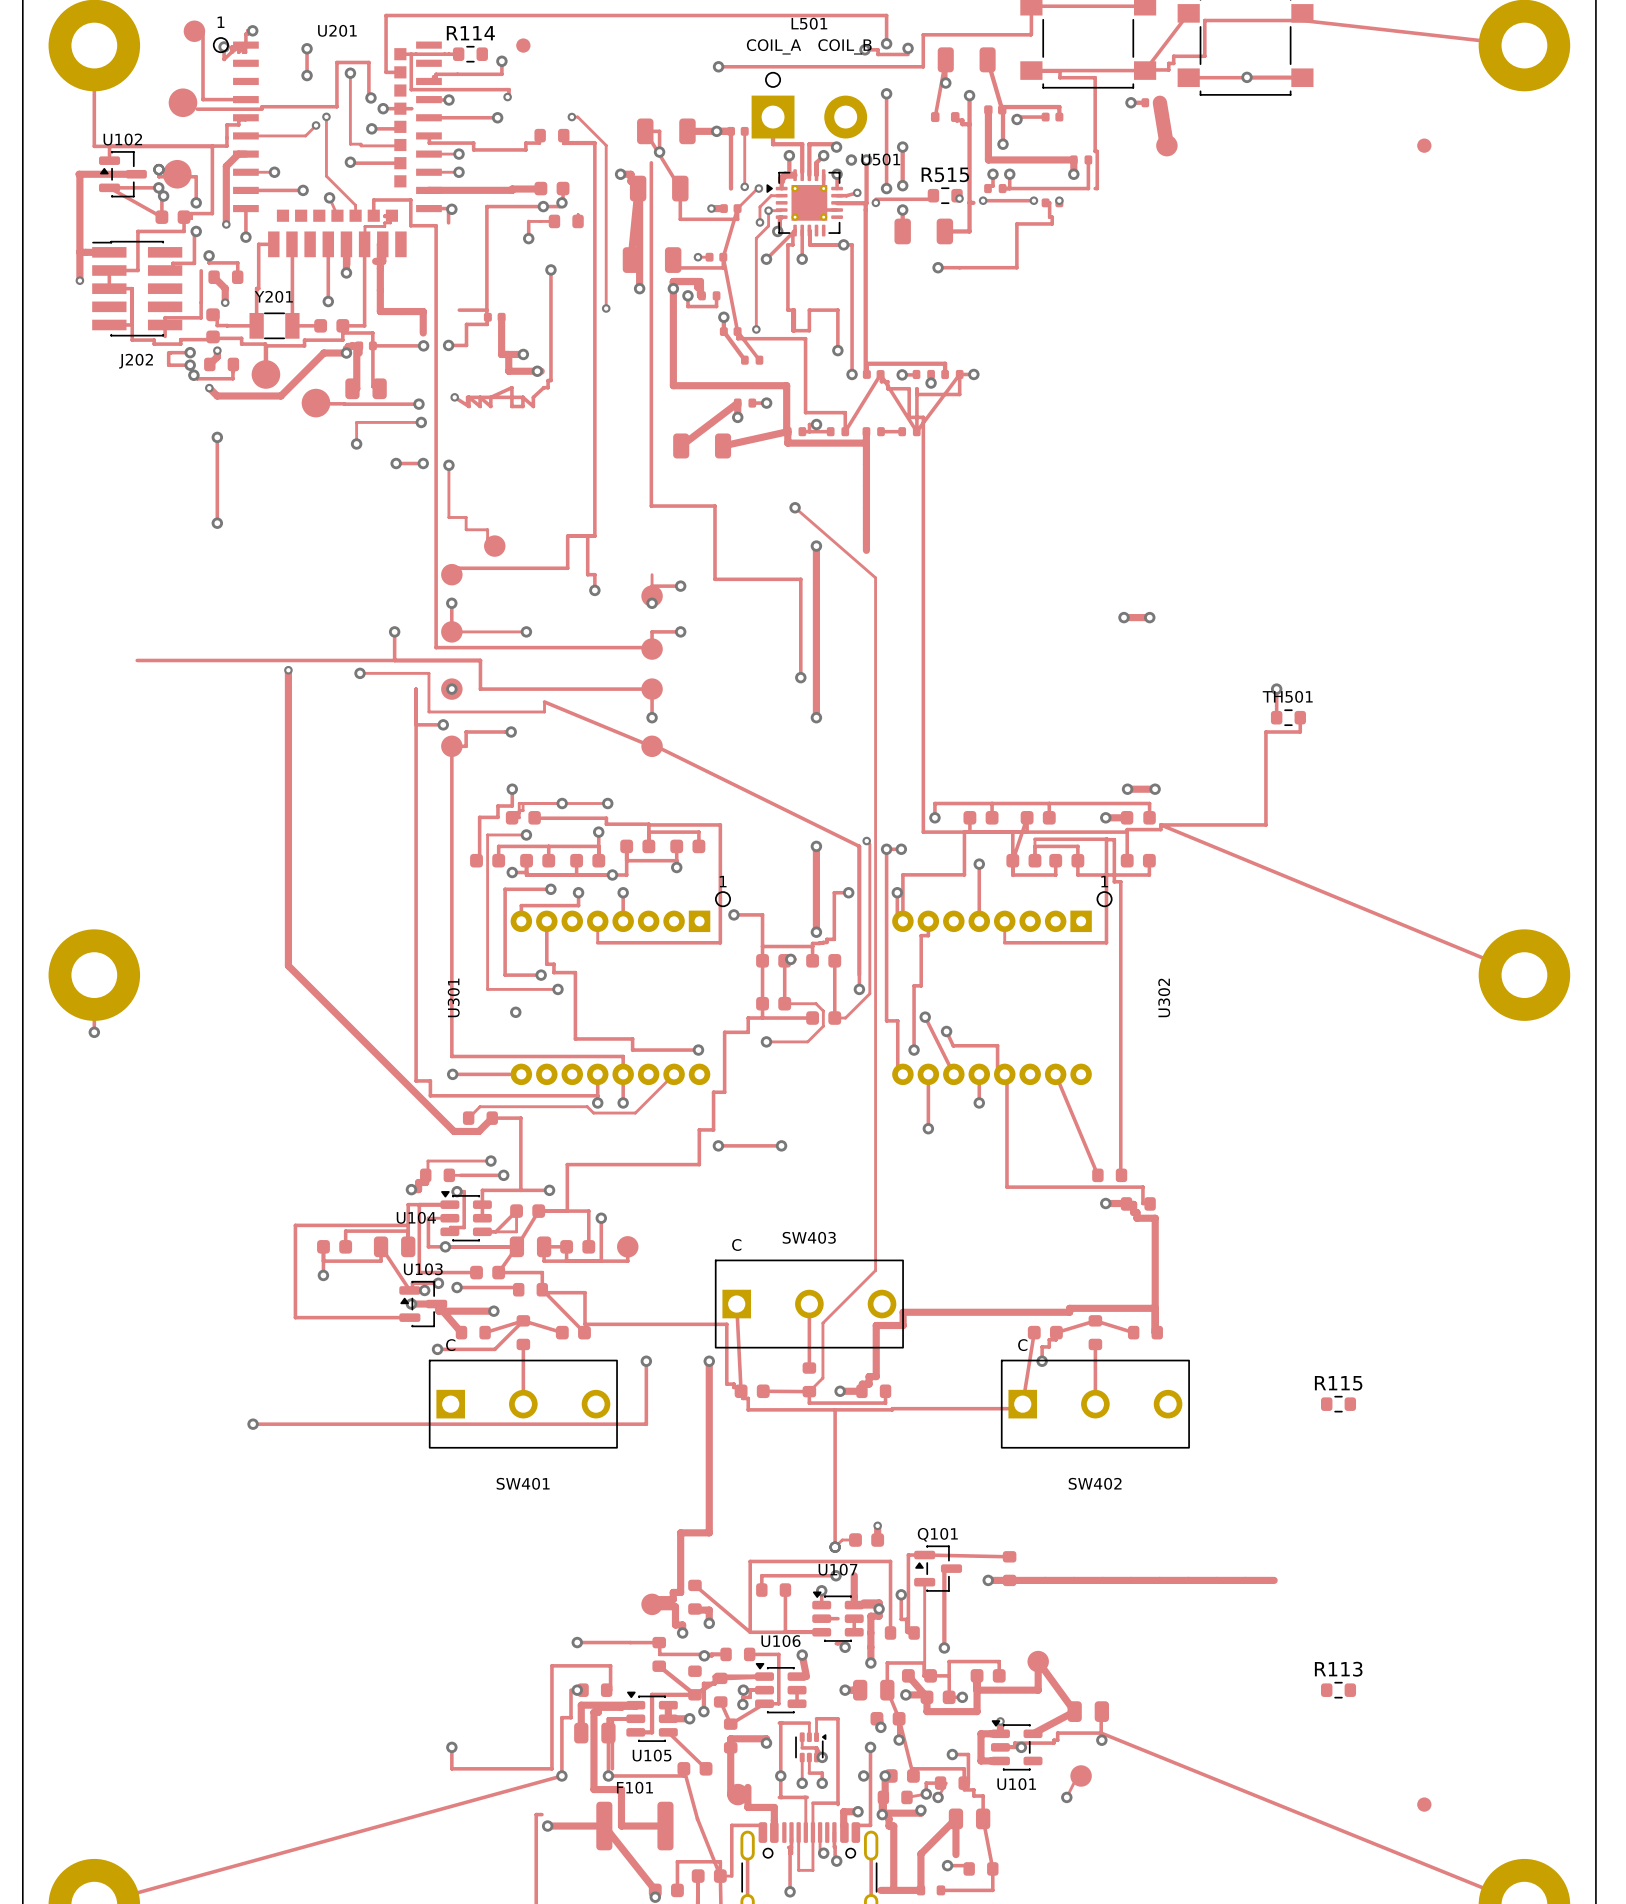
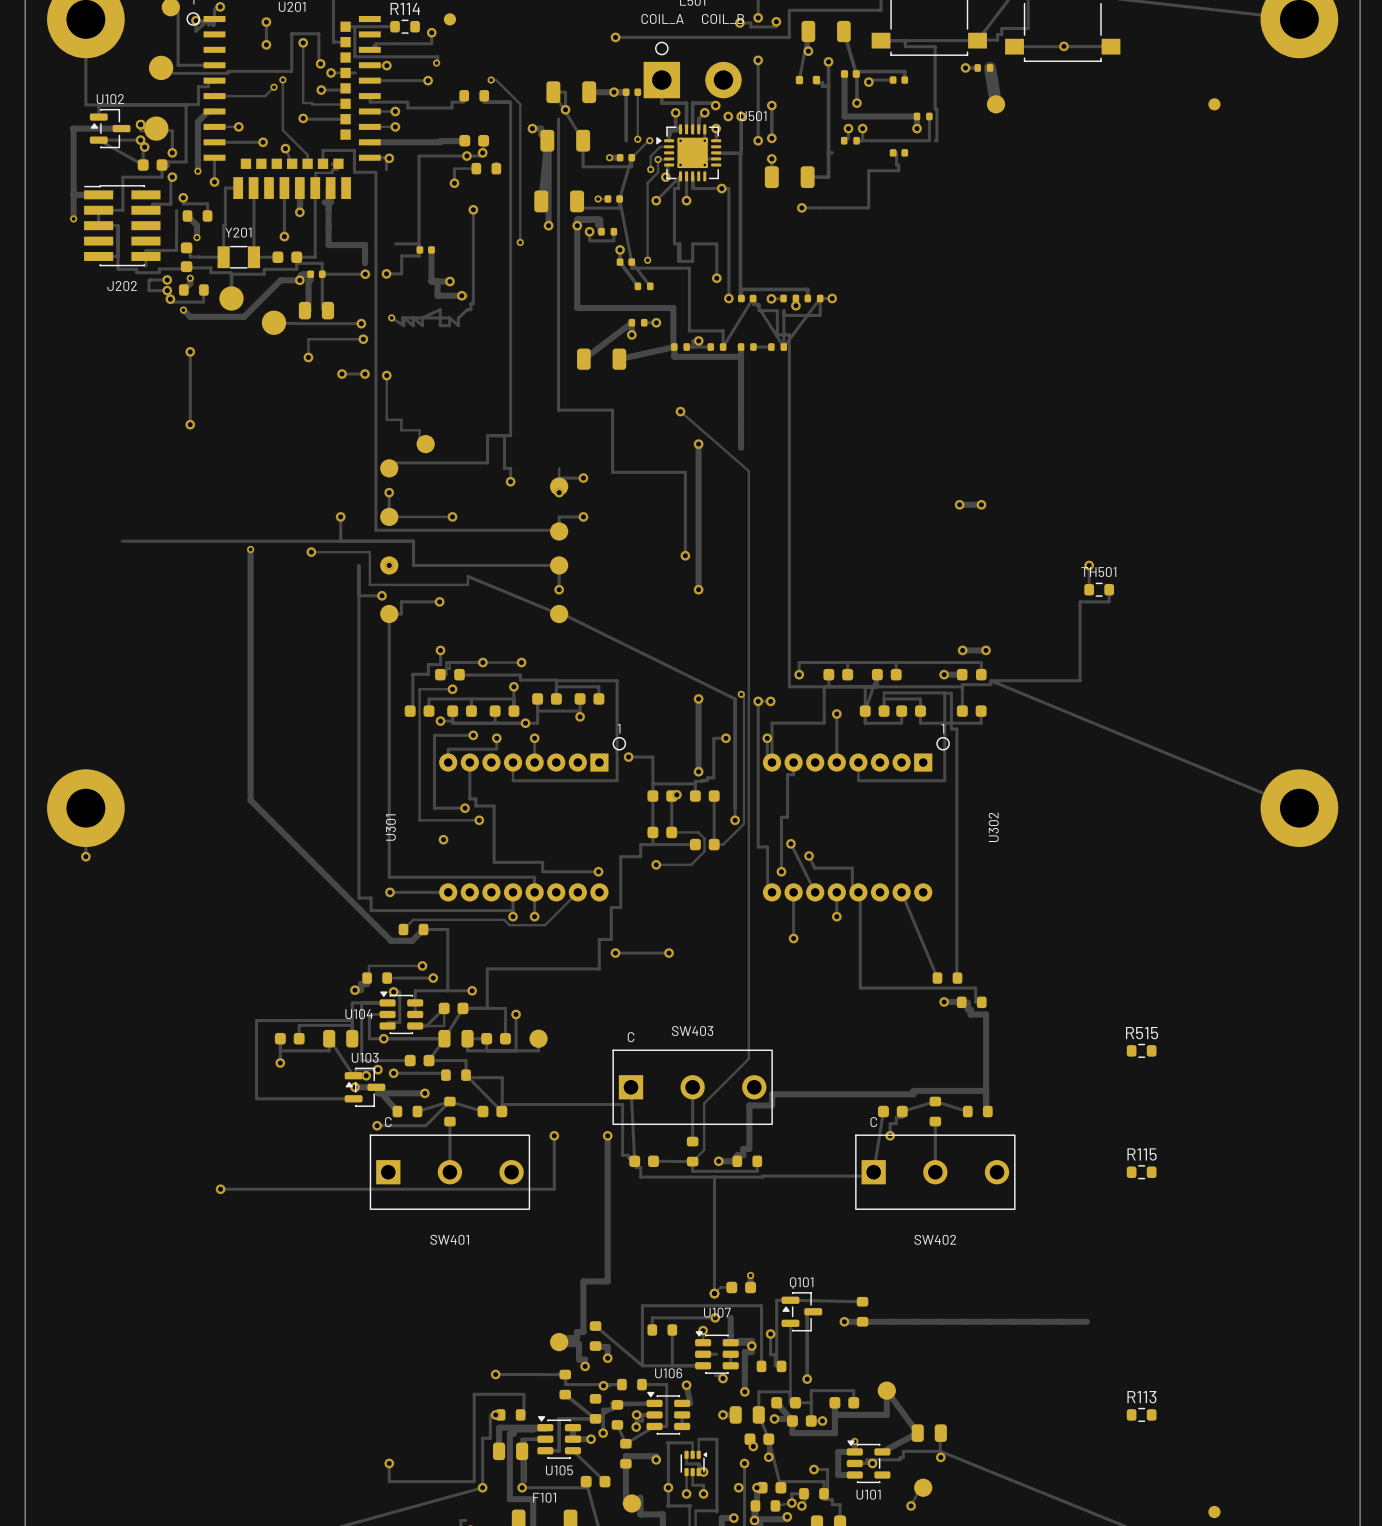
track: (857, 192) (837, 195) -> none
via: (857, 192) -> none
track: (933, 195) (933, 199) (875, 199) -> none
R515 position: (945, 195) -> (1141, 1050)
via: (959, 198) -> none
track: (983, 200) (1033, 200) -> none
via: (983, 200) -> none
via: (1033, 200) -> none
via: (1059, 200) -> none
via: (875, 202) -> none

